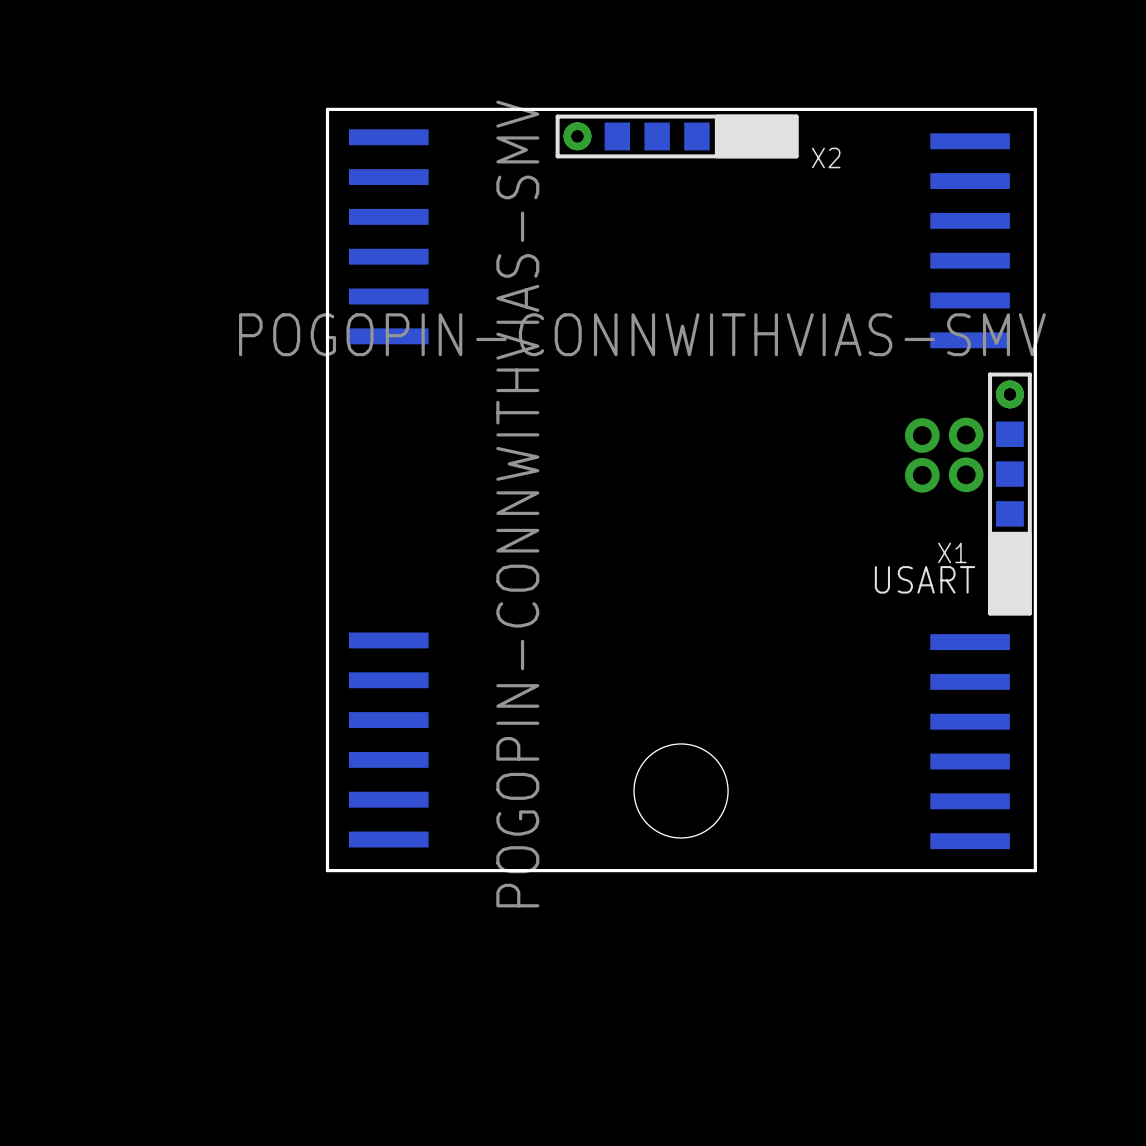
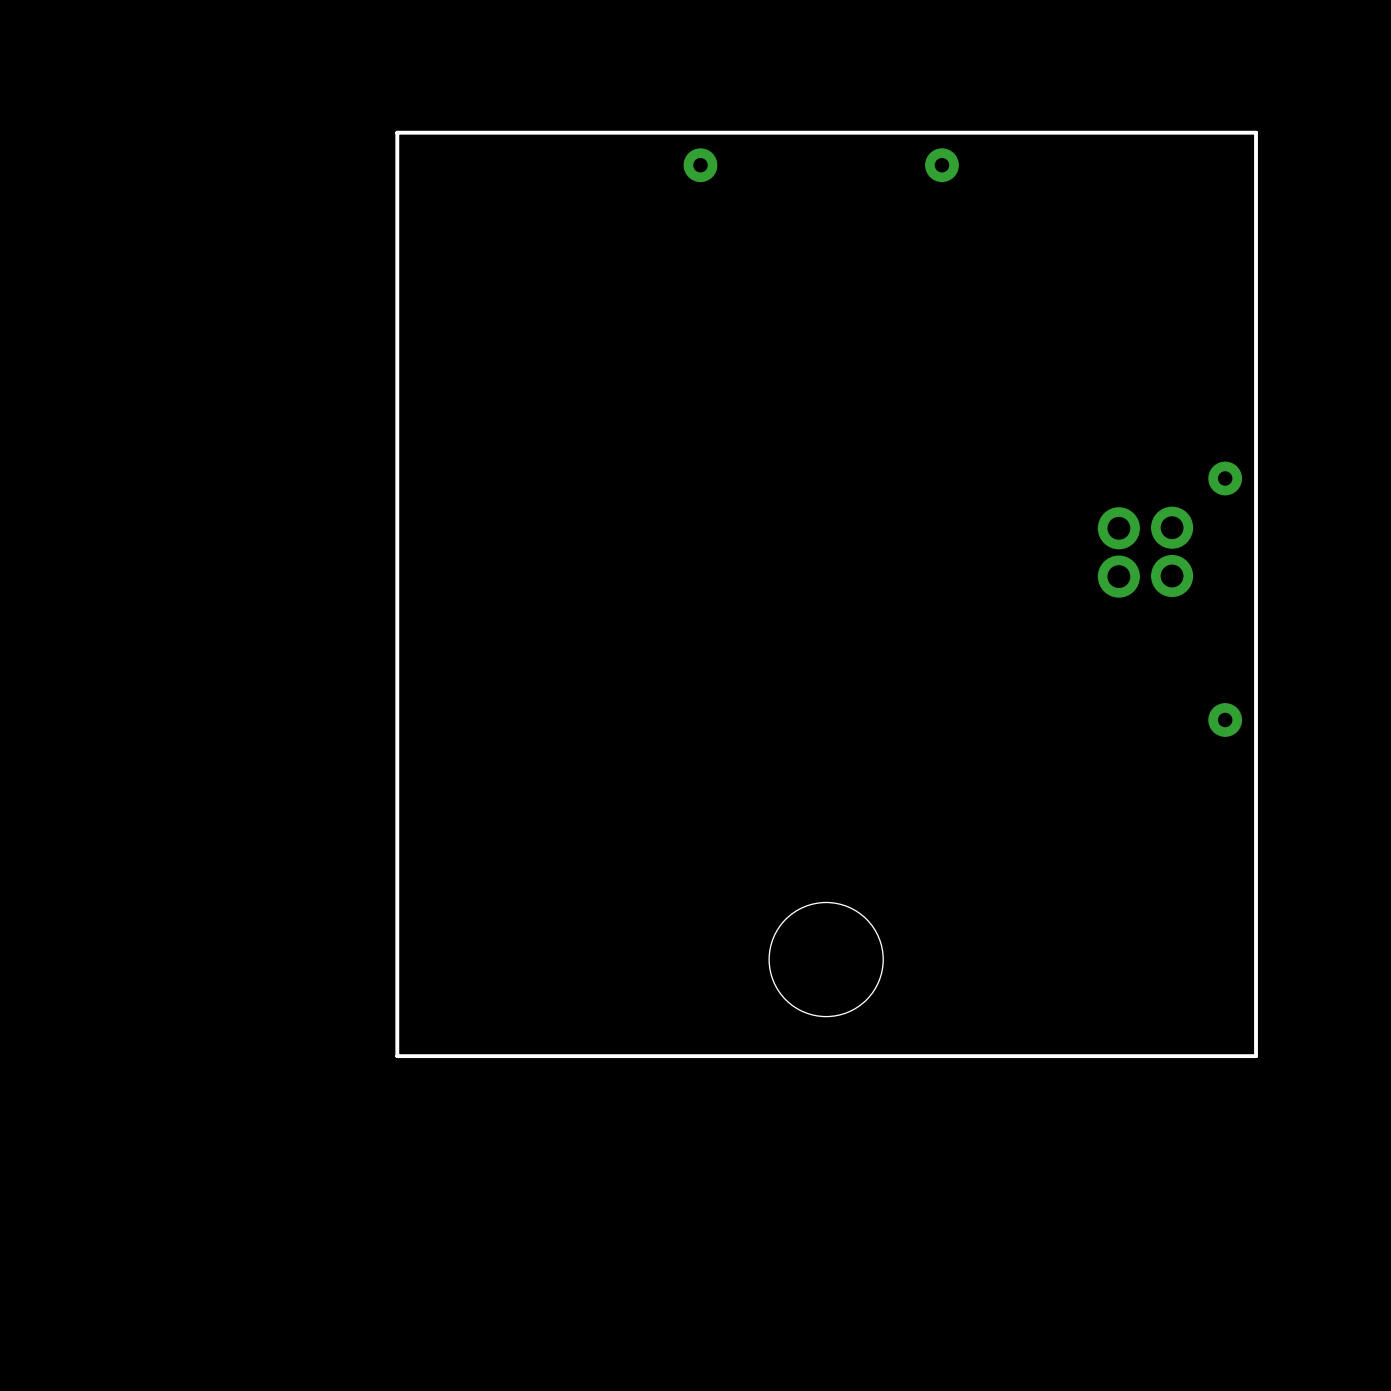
X2: POGOPIN-CONNWITHVIAS-SMV (677, 136) -> none
part: (388, 236) -> none
part: (970, 240) -> none
X1: POGOPIN-CONNWITHVIAS-SMV (1009, 493) -> none
text: USART (925, 579) -> none
part: (388, 739) -> none
part: (970, 741) -> none

